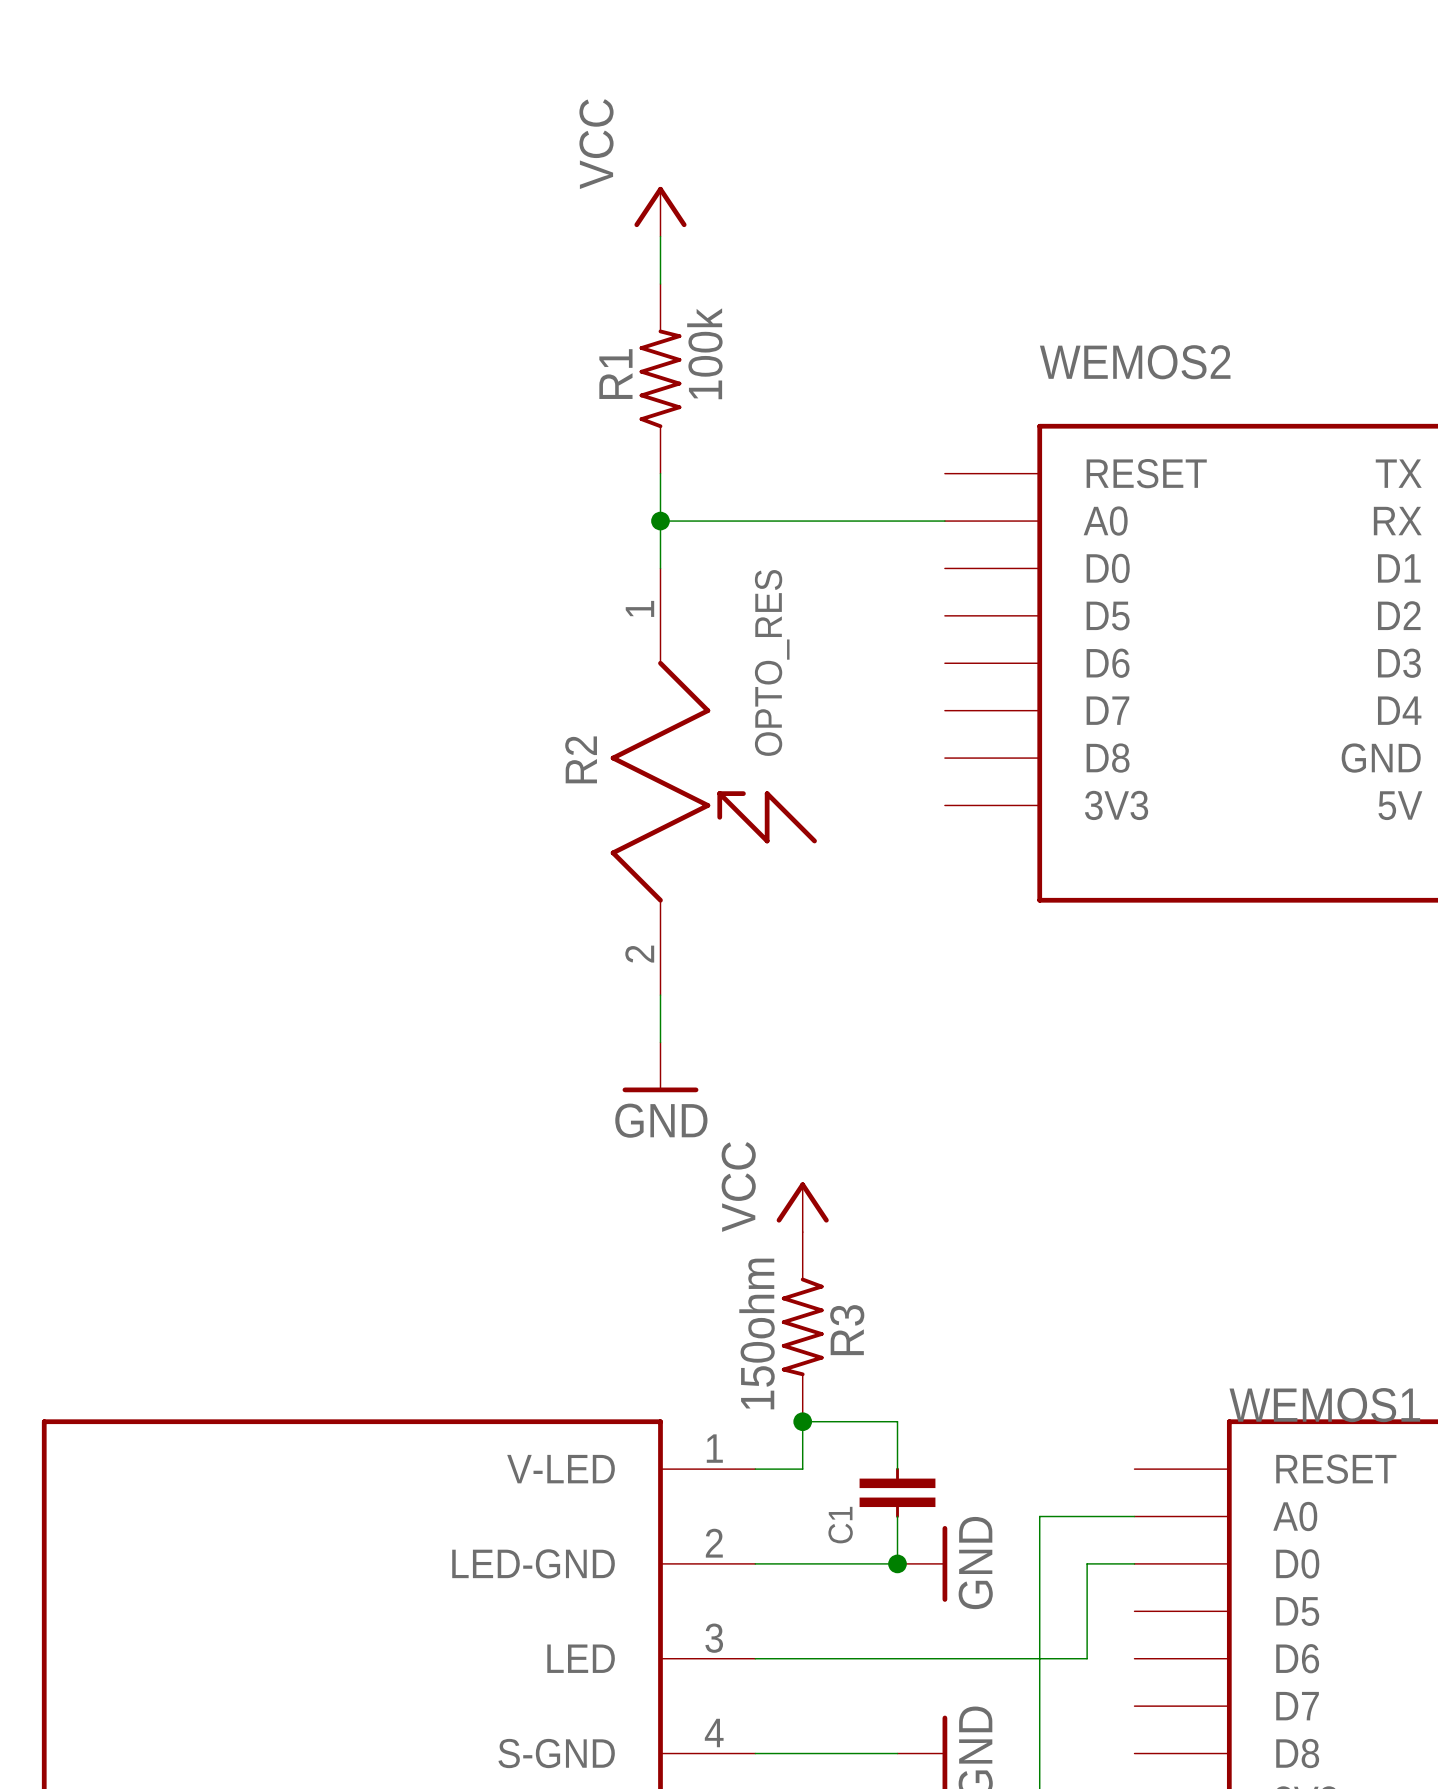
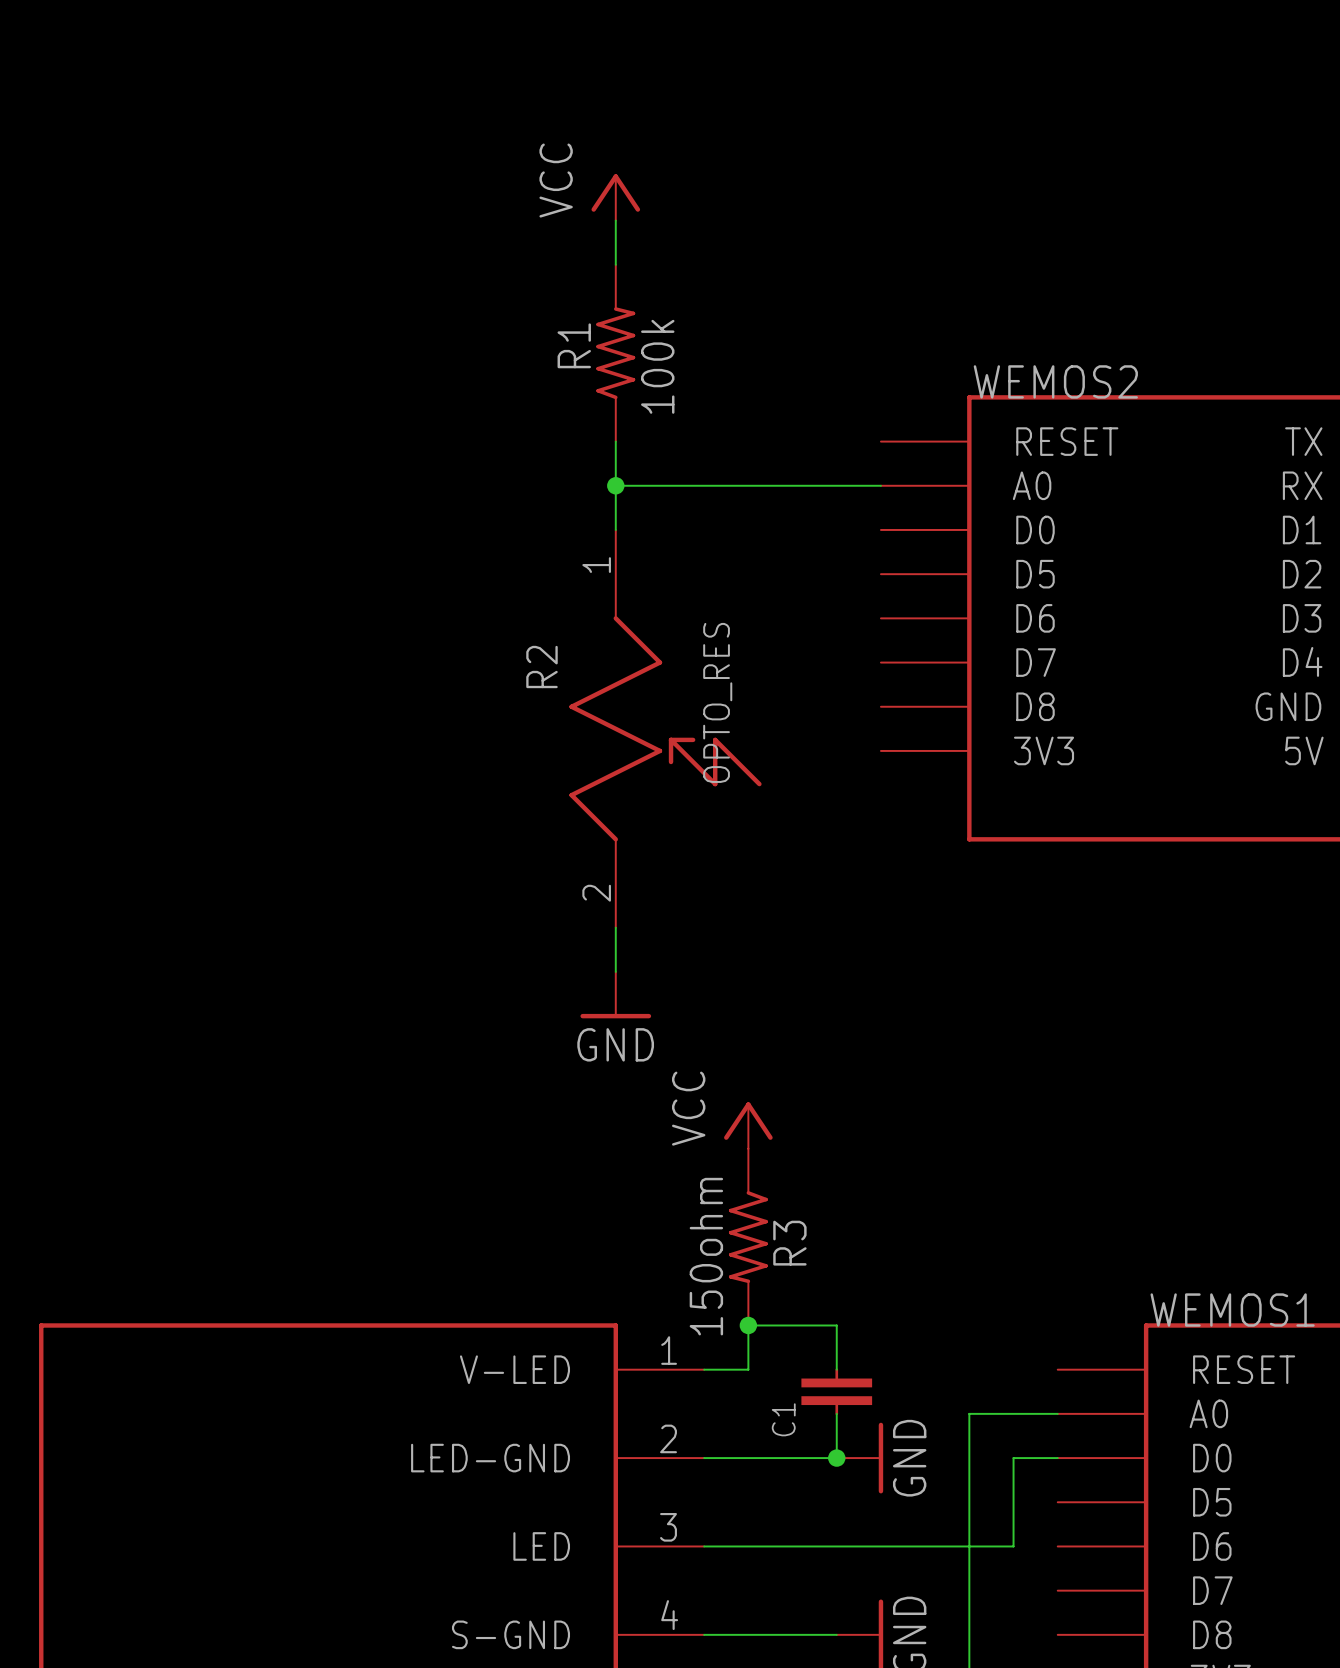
power symbol text position: VCC (596, 144) -> VCC (556, 180)
R1 value position: 100k (704, 353) -> 100k (657, 366)
WEMOS2 name position: WEMOS2 (1135, 362) -> WEMOS2 (1055, 381)
R2 value position: OPTO_RES (772, 662) -> OPTO_RES (717, 702)
R2 name position: R2 (581, 759) -> R2 (541, 667)

